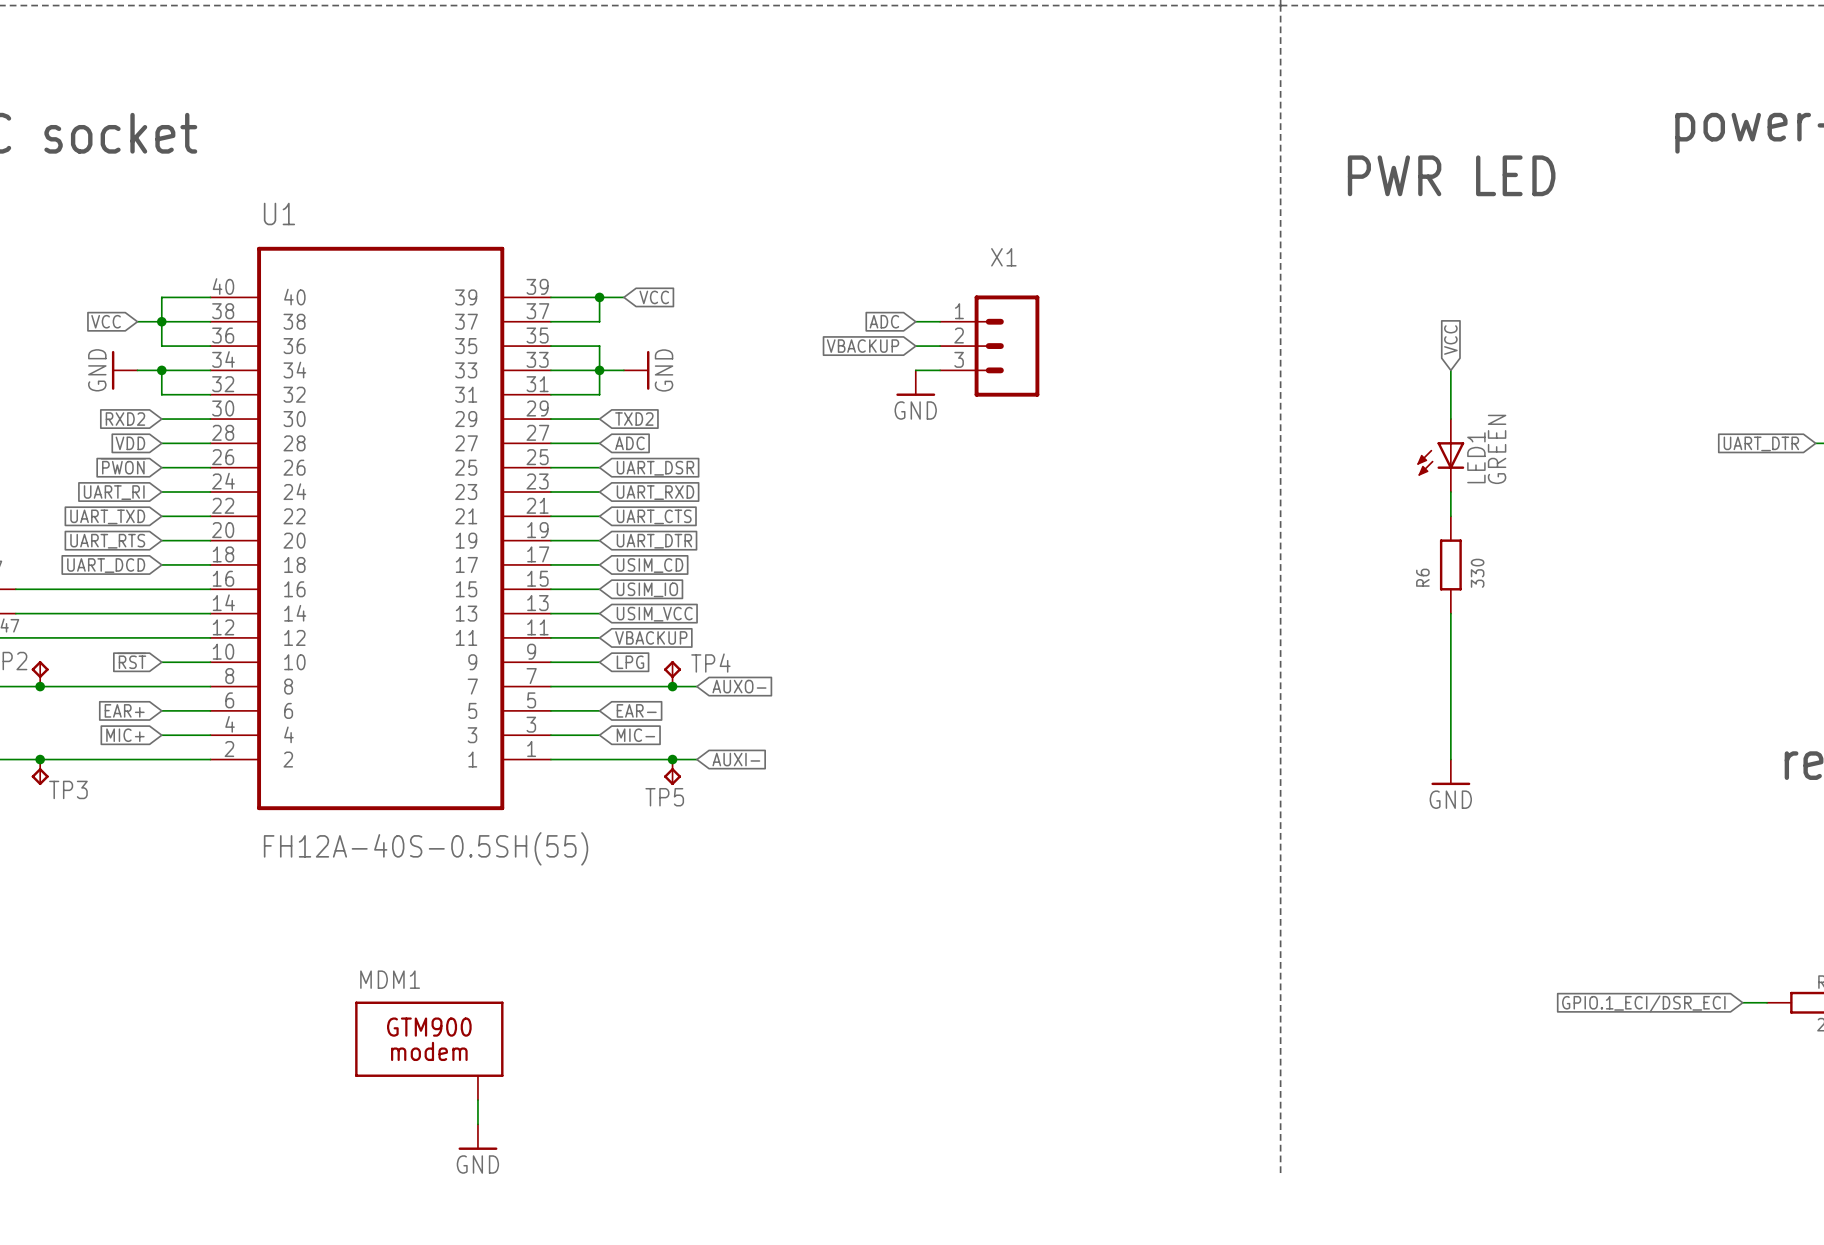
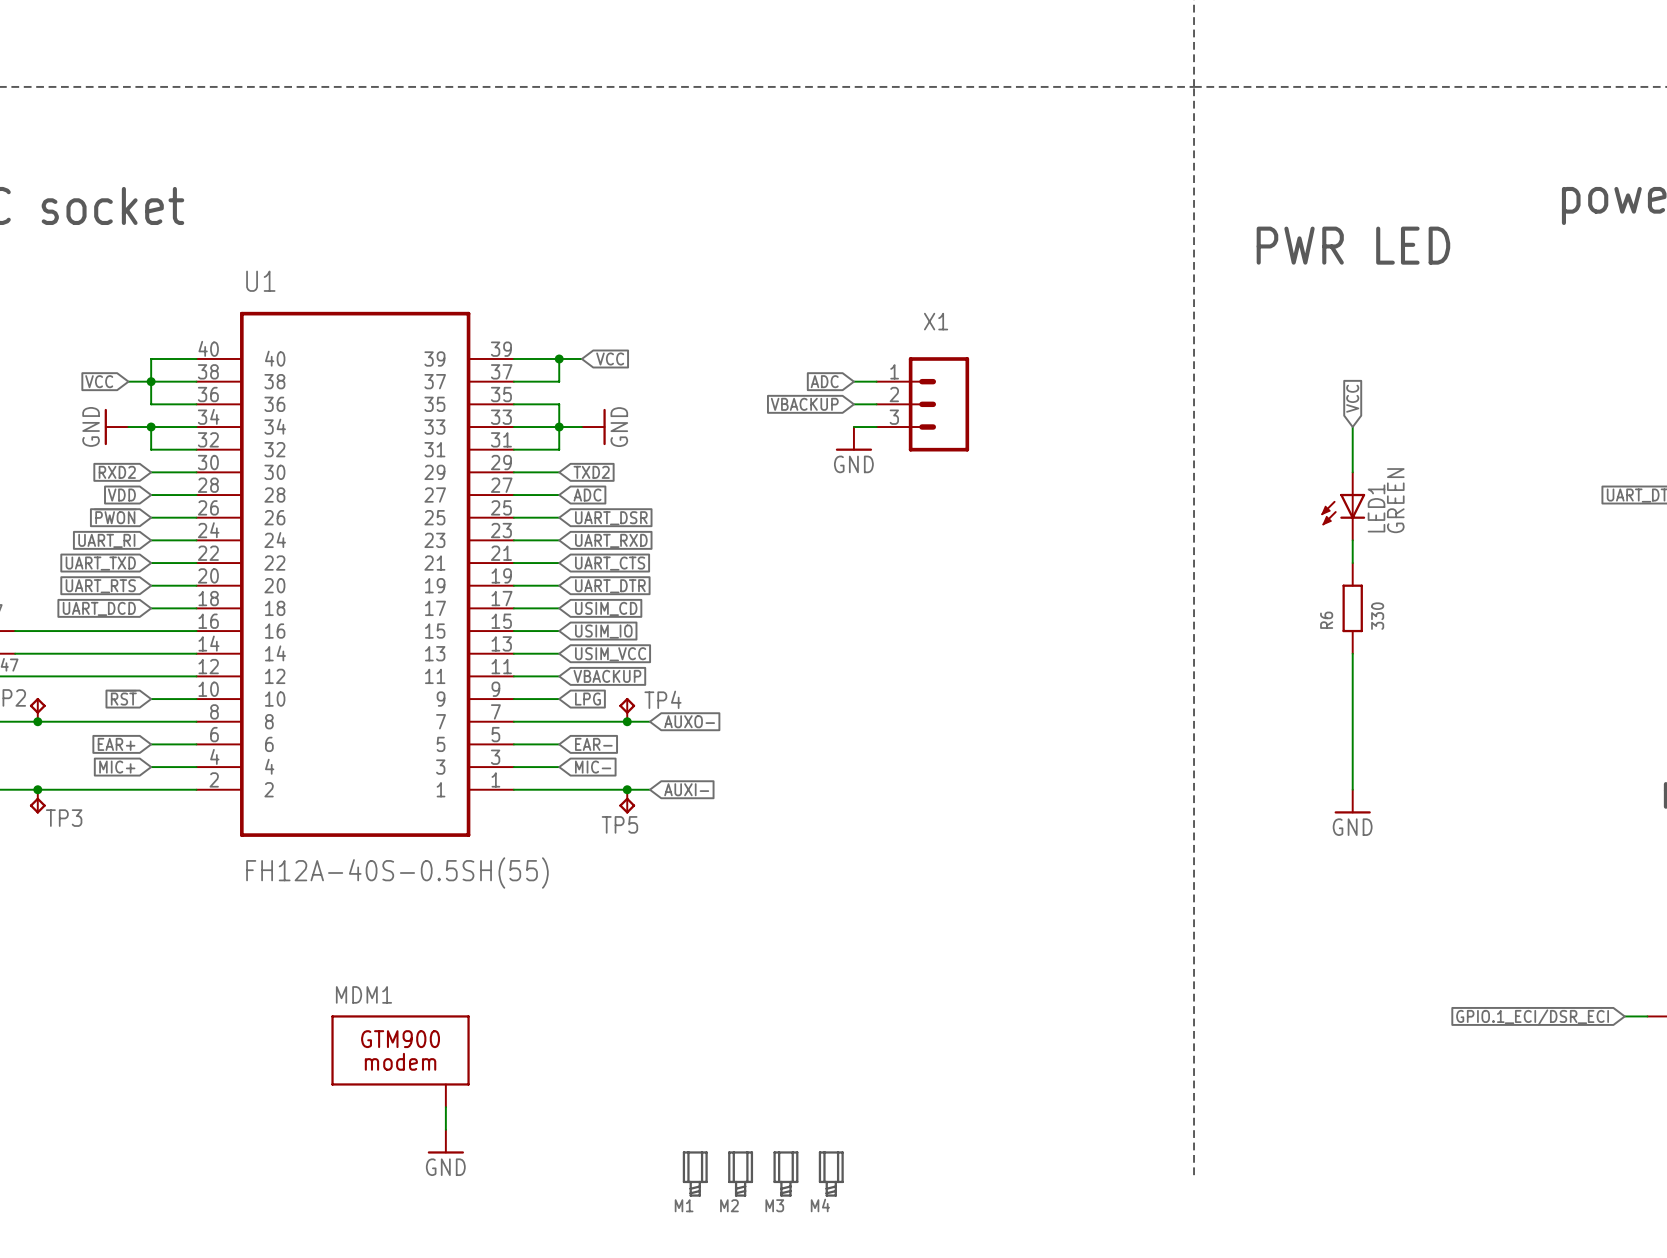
M1: none -> (695, 1174)
M2: none -> (740, 1174)
M3: none -> (785, 1174)
M4: none -> (831, 1174)

